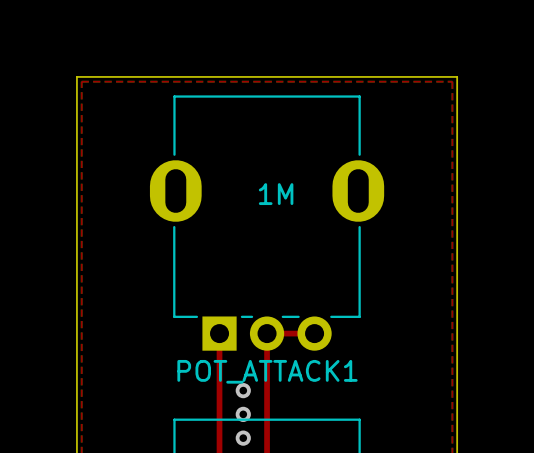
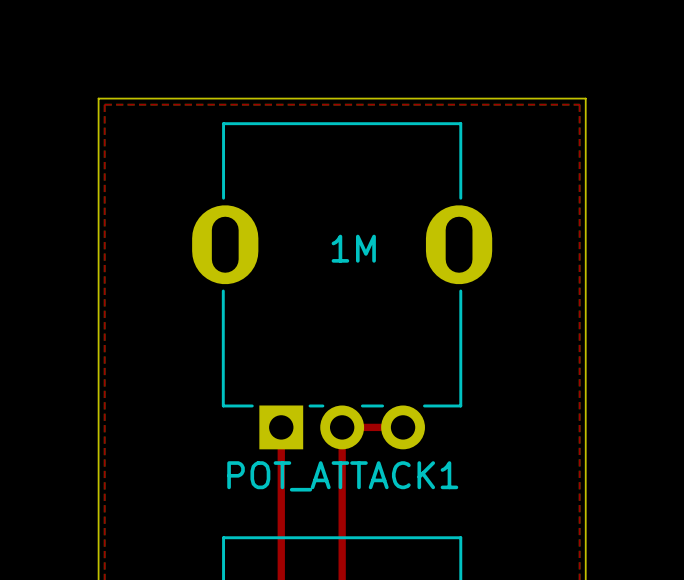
via: (243, 390) -> none
via: (243, 414) -> none
via: (243, 438) -> none

